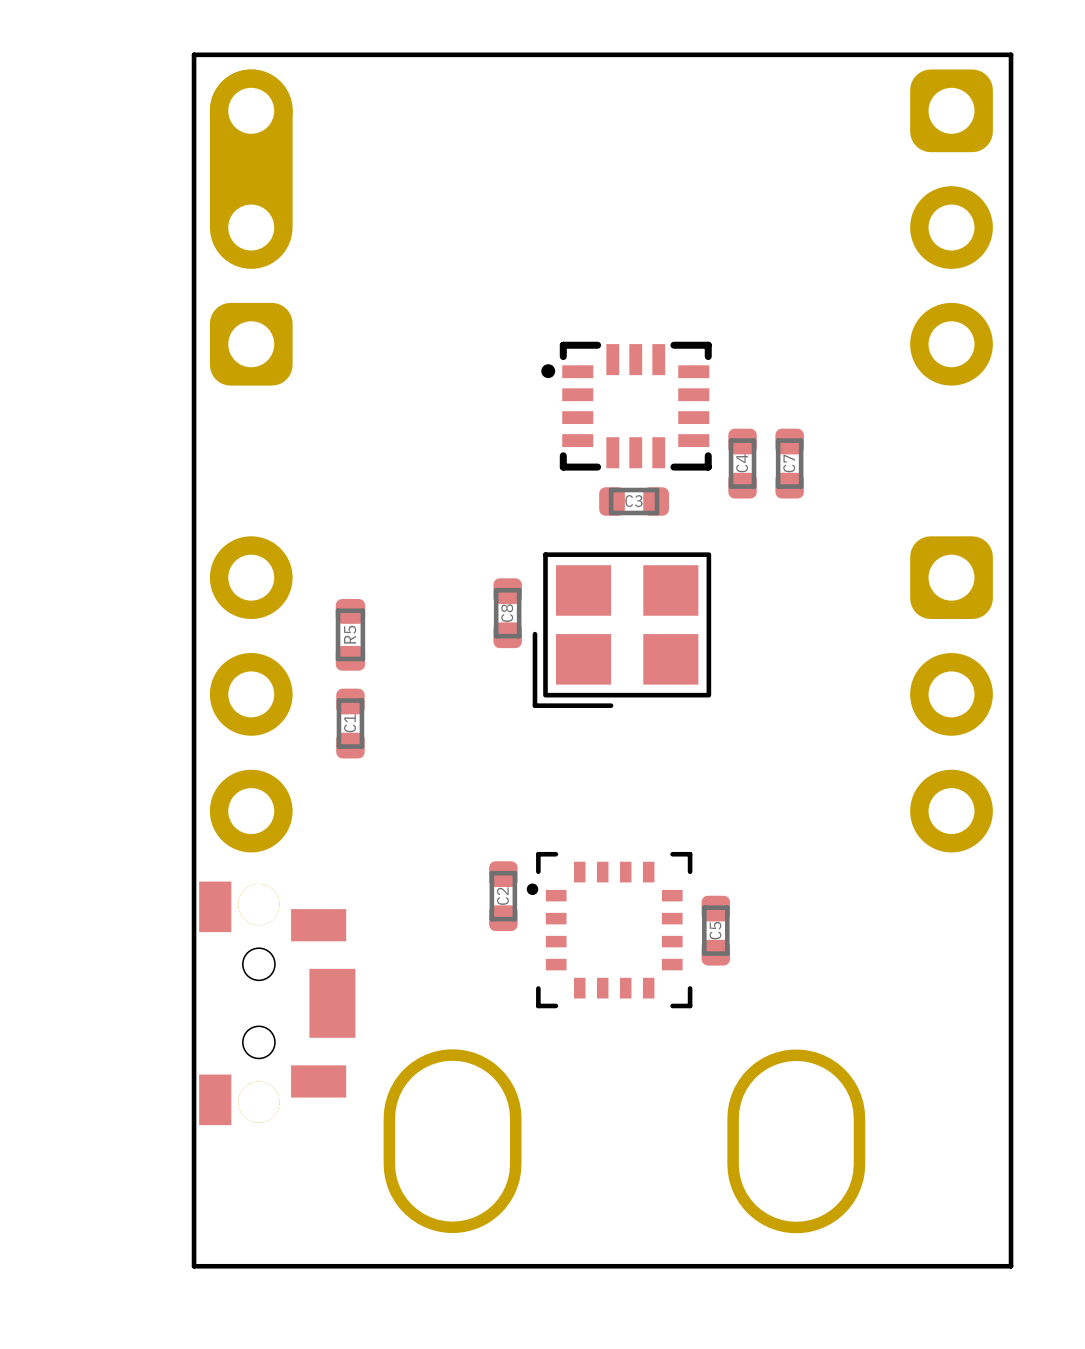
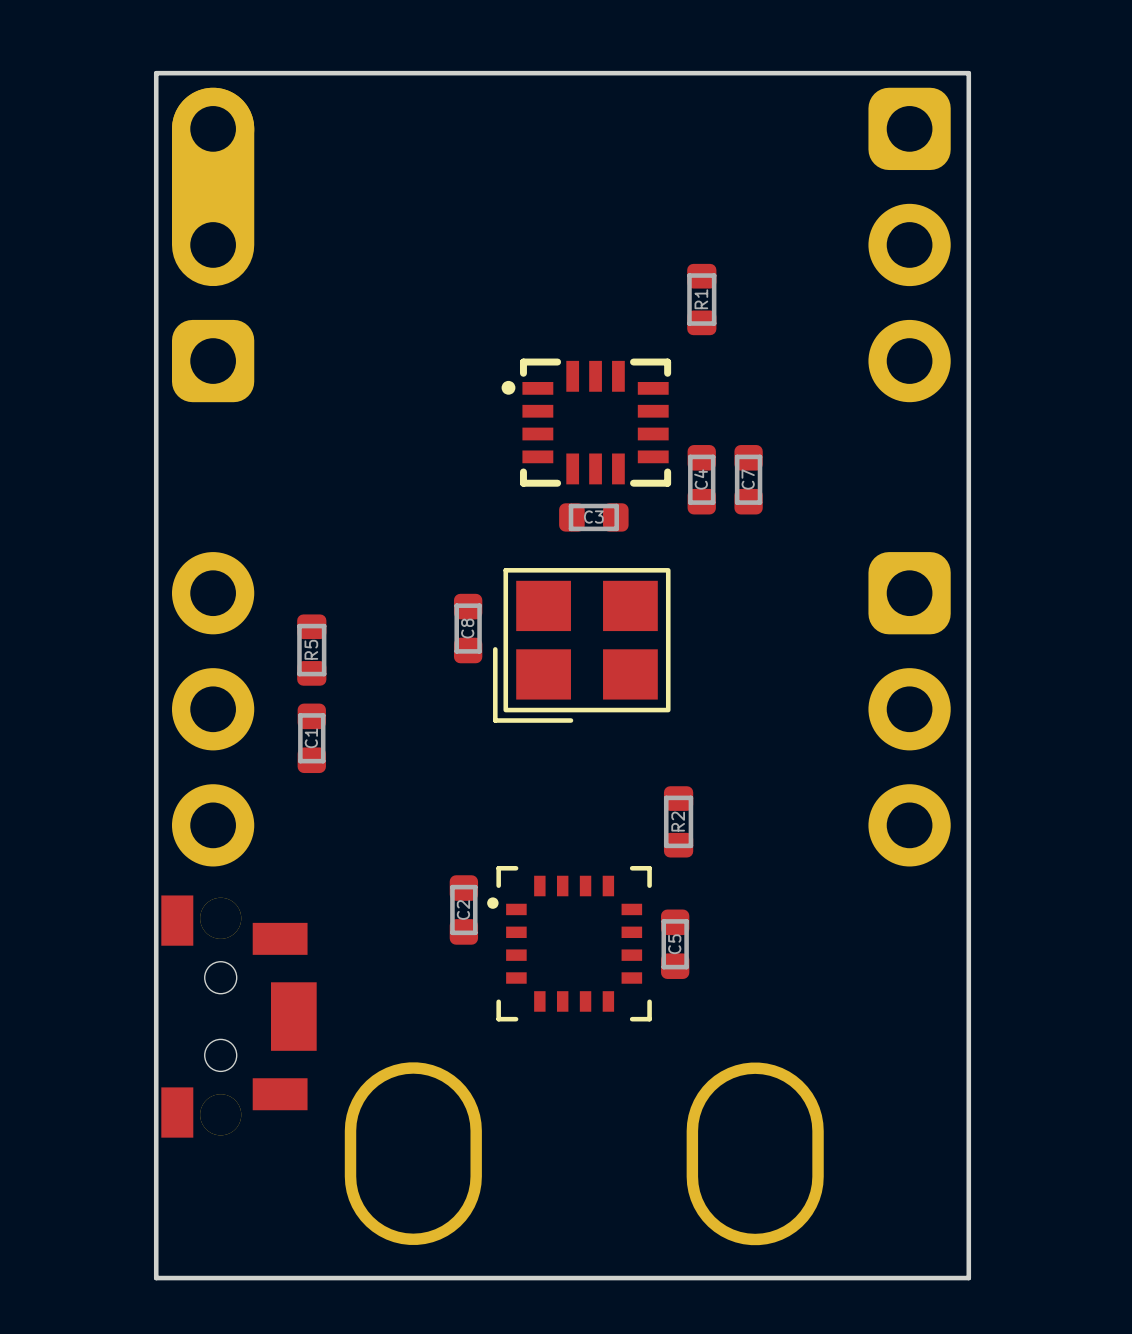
R1: none -> (701, 299)
R2: none -> (678, 821)

